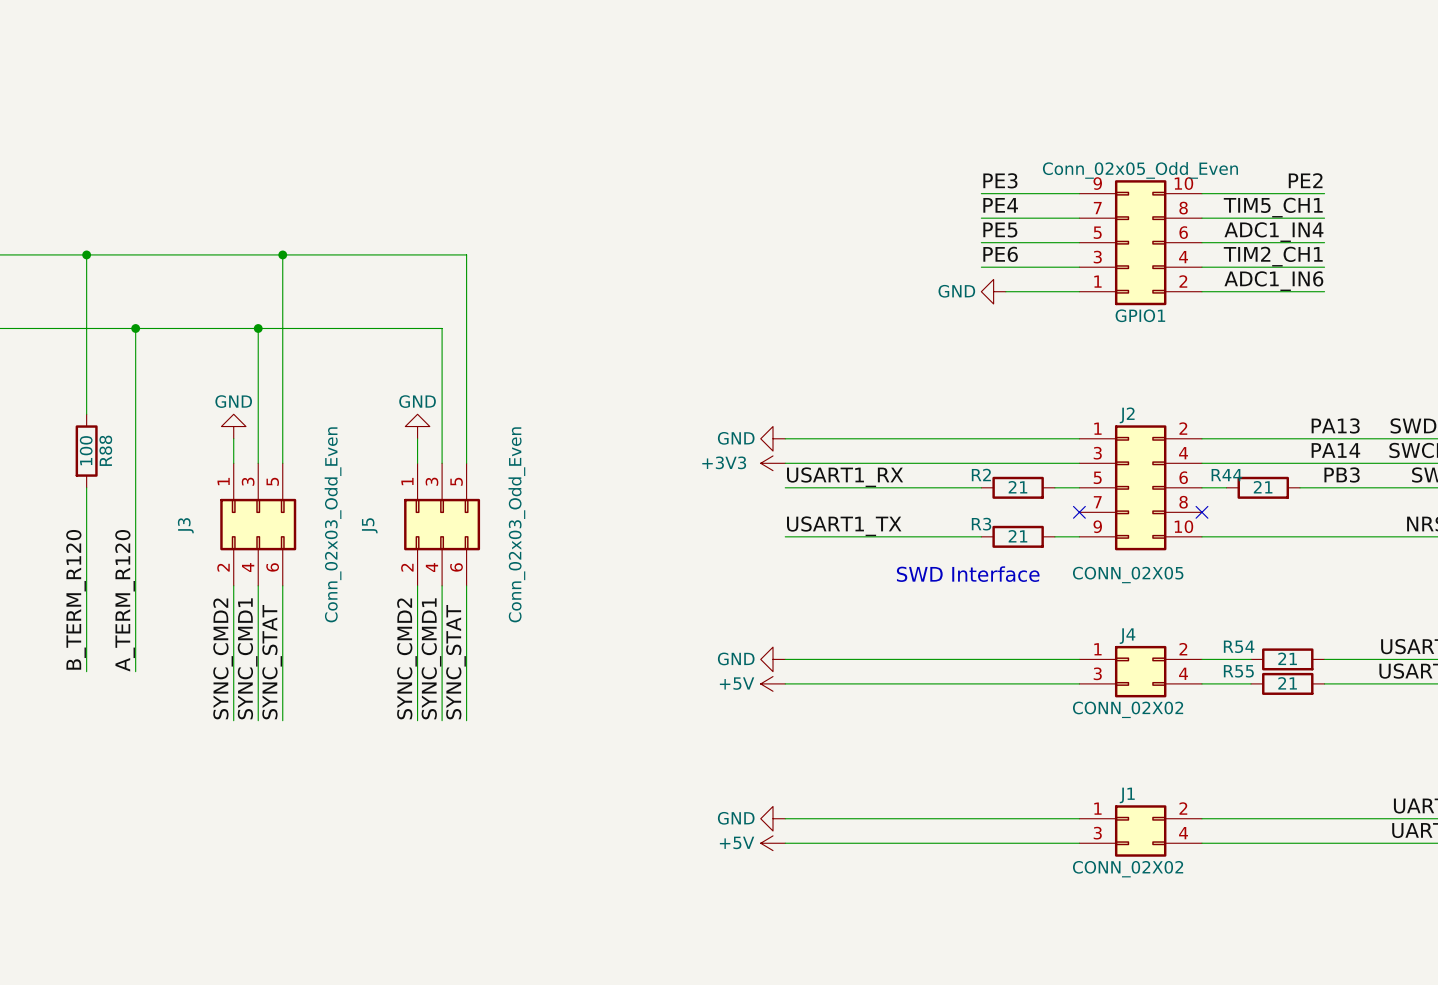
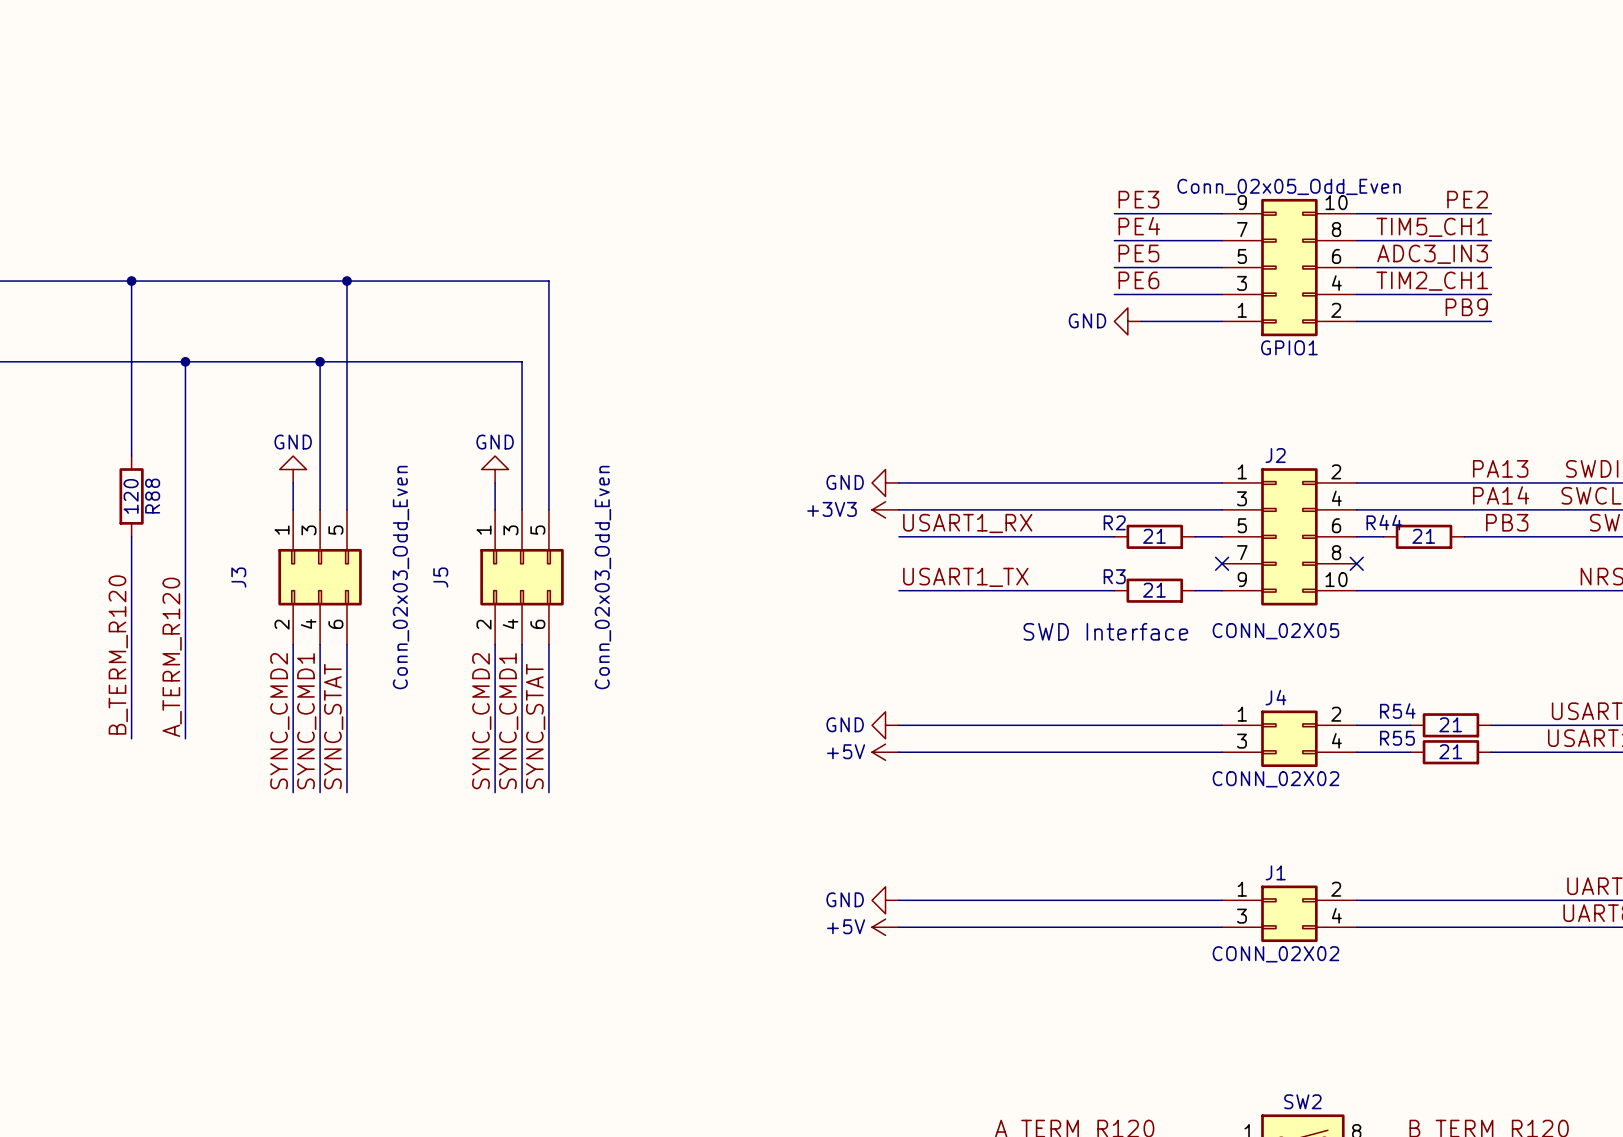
label: ADC1_IN4 (1273, 232) -> ADC3_IN3 (1432, 254)
label: ADC1_IN6 (1273, 281) -> PB9 (1466, 307)
R88 value: 100 (86, 450) -> 120 (131, 496)

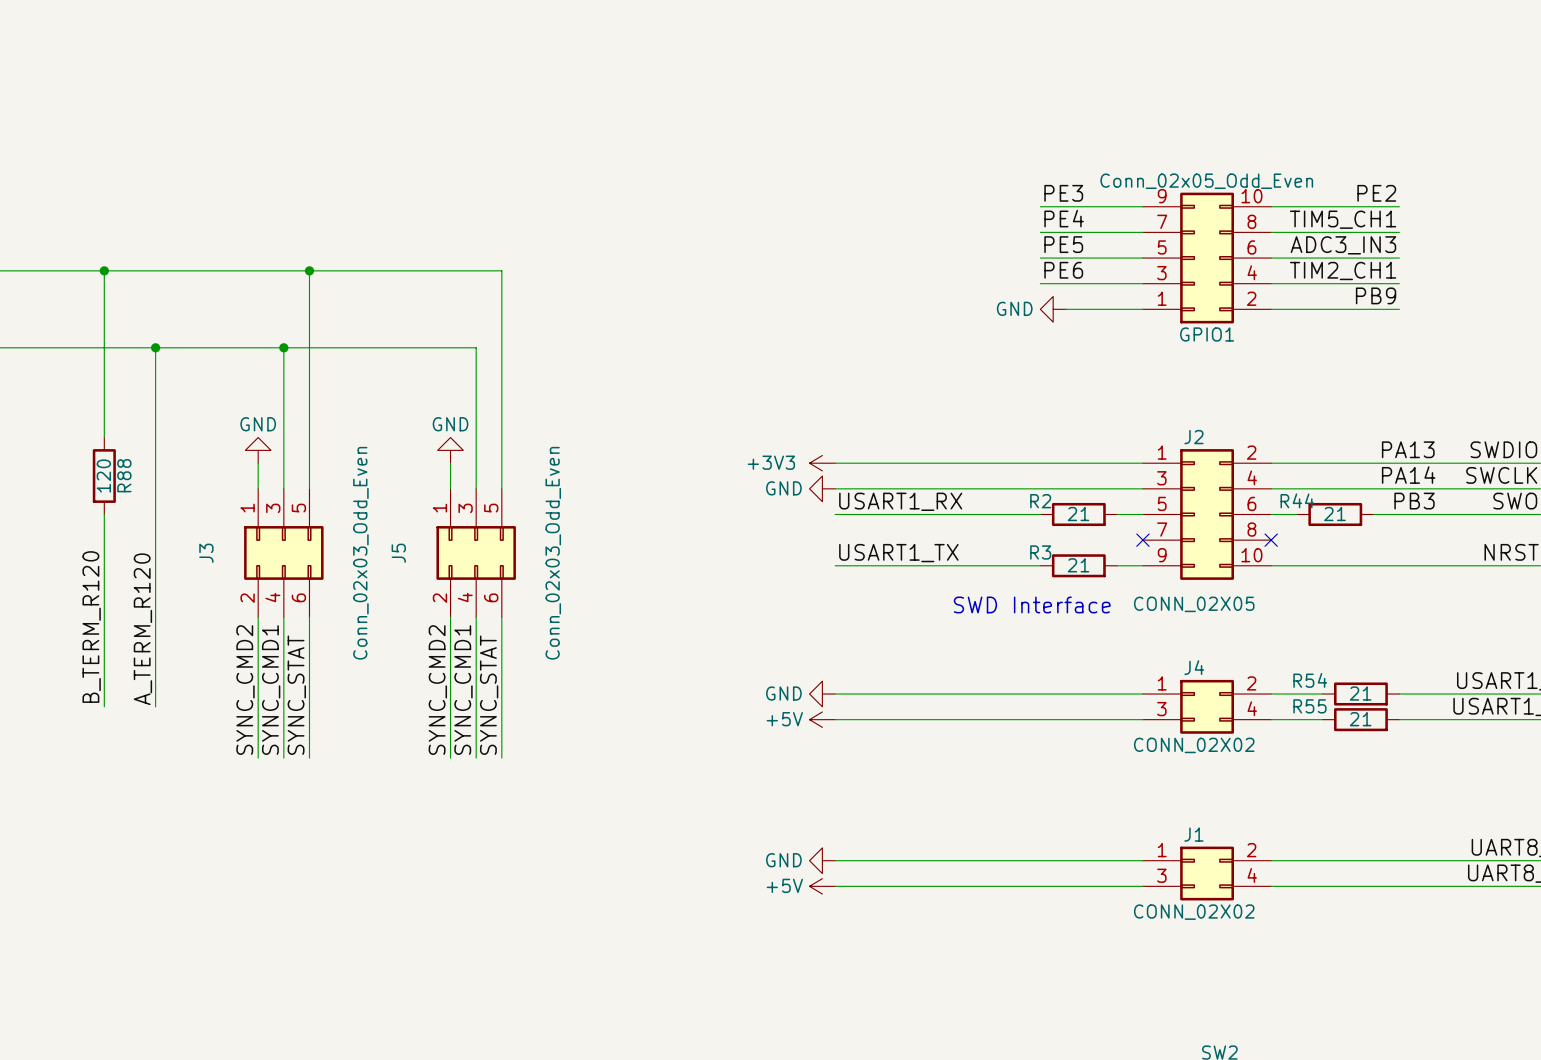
power symbol: GND (885, 482) -> +3V3 (822, 463)
power symbol: +3V3 (885, 509) -> GND (822, 488)

